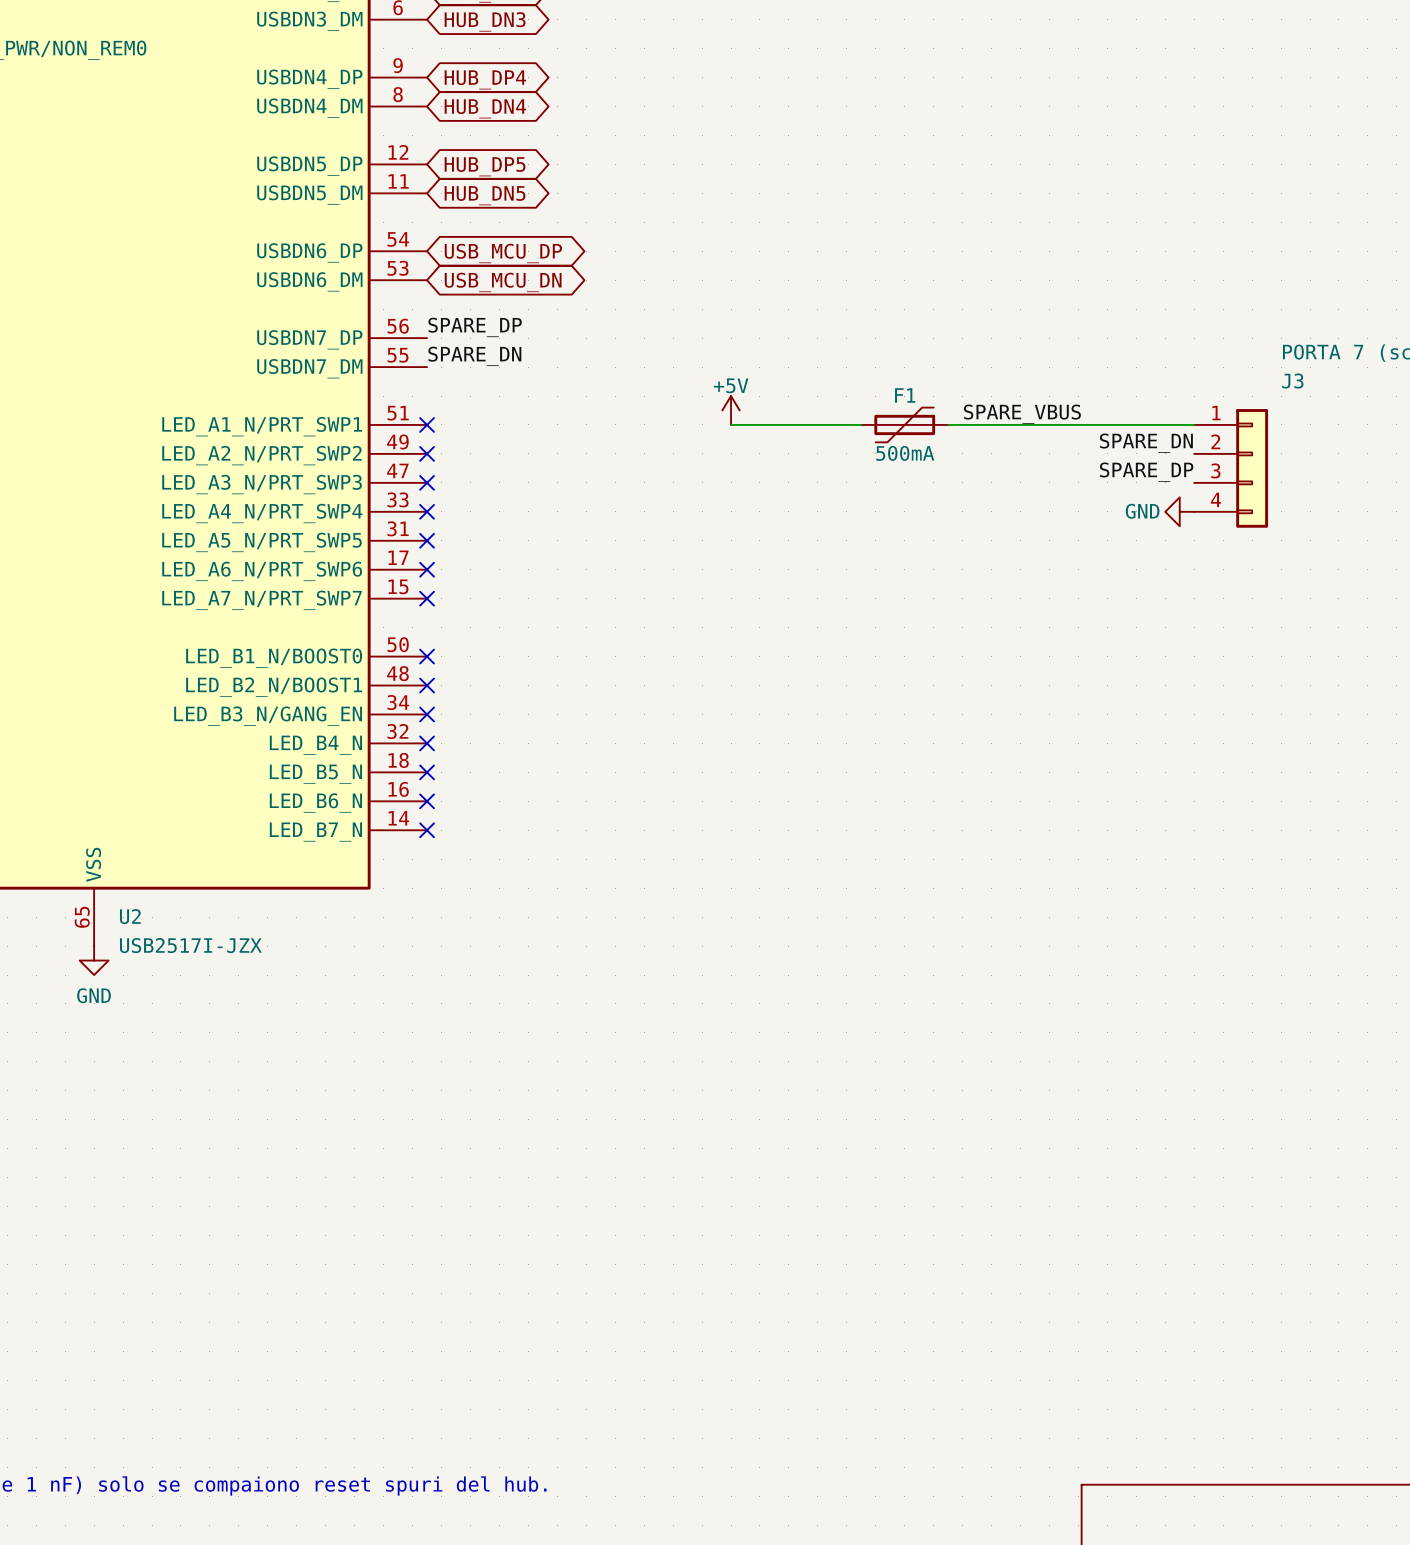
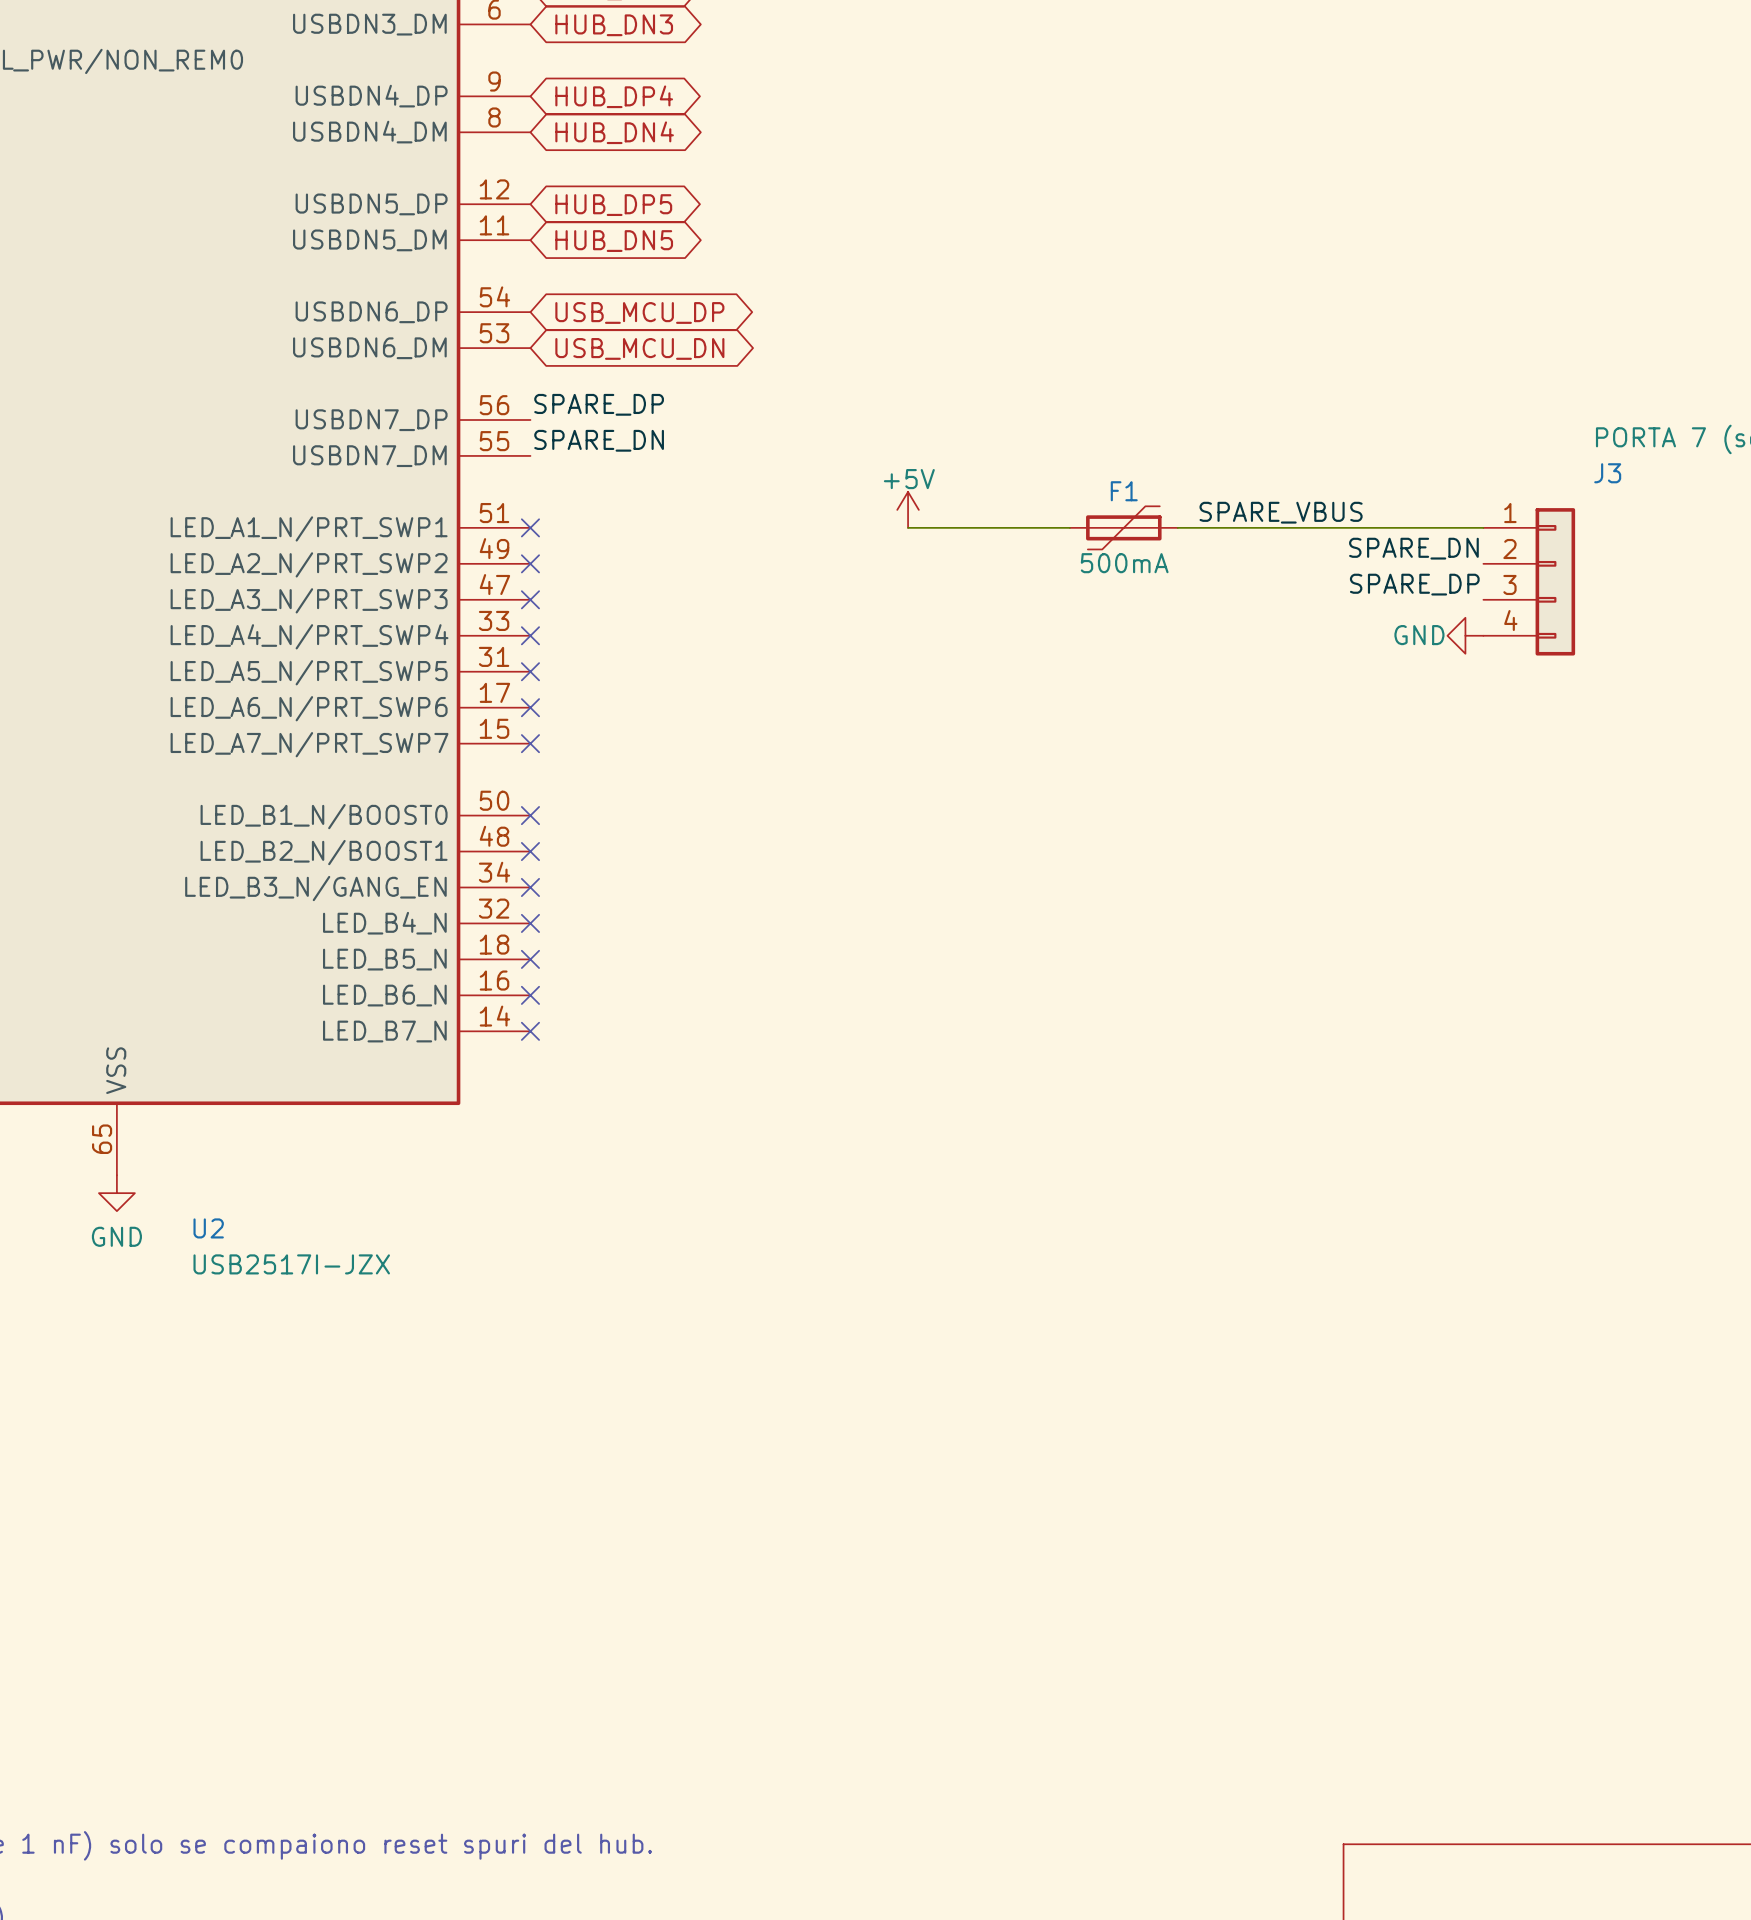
U2 name position: U2 (130, 916) -> U2 (208, 1228)
U2 value position: USB2517I-JZX (190, 945) -> USB2517I-JZX (291, 1264)

